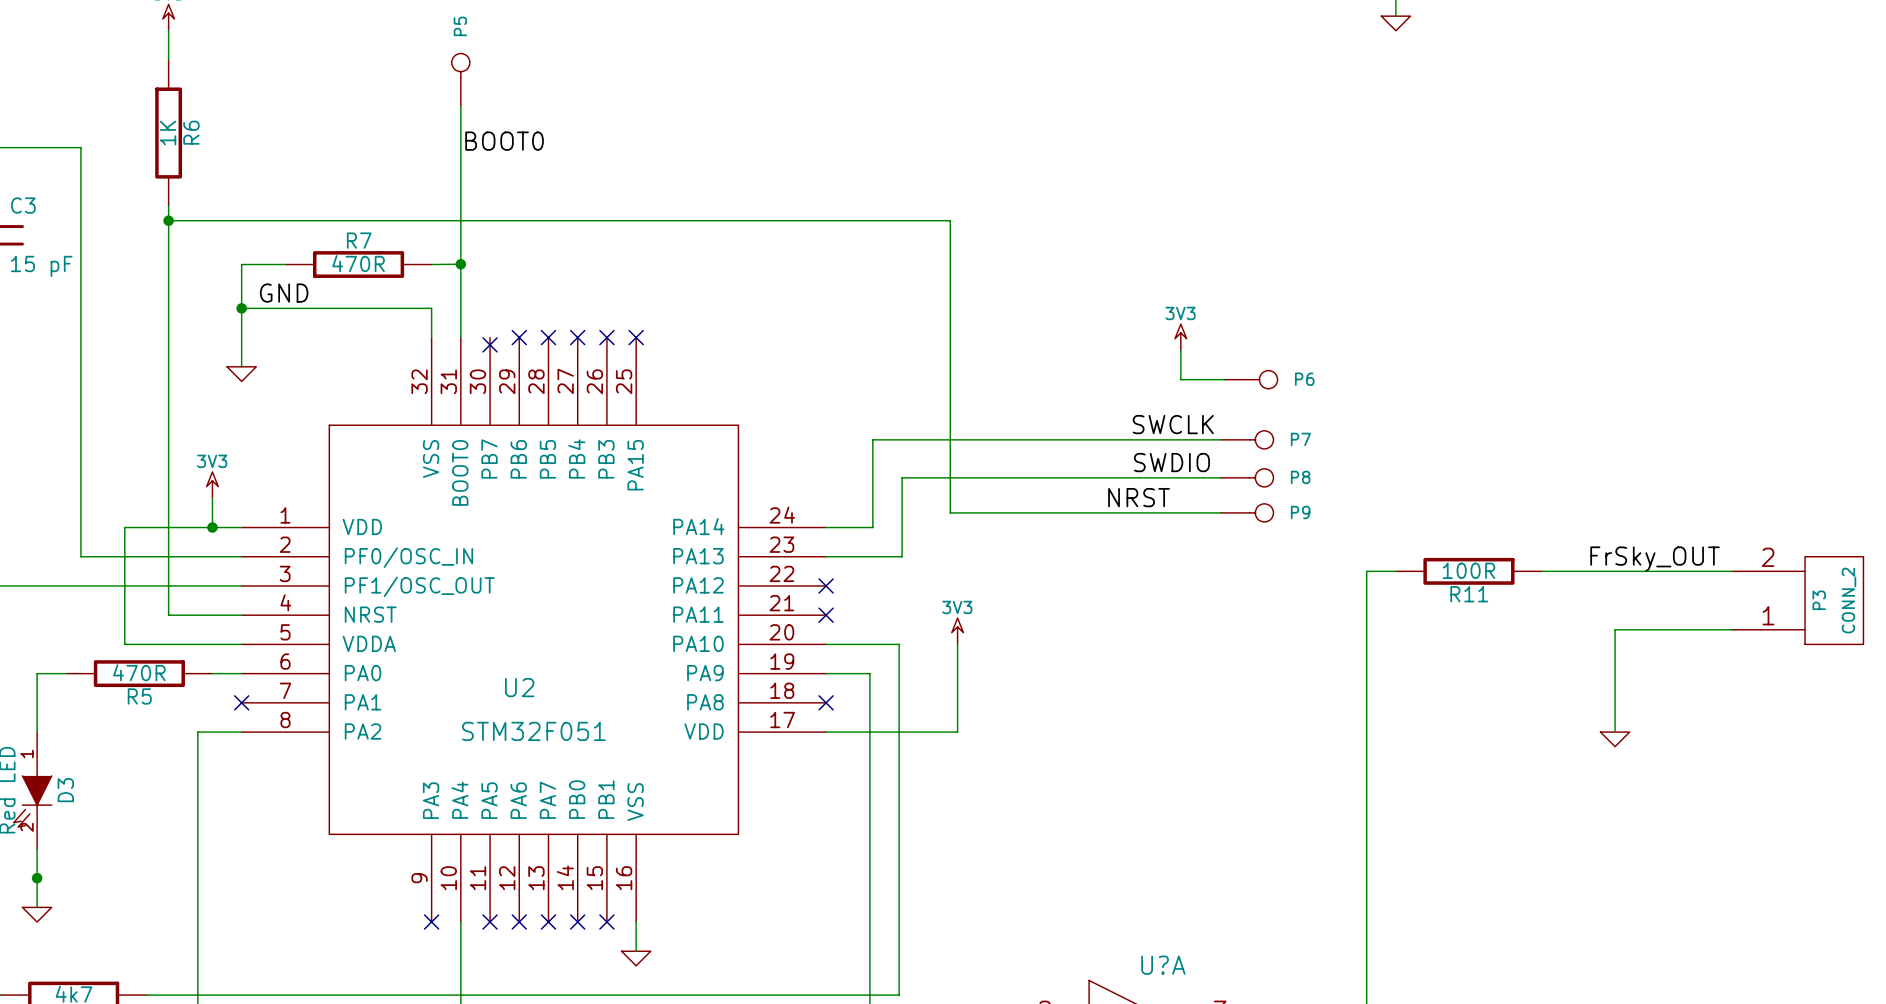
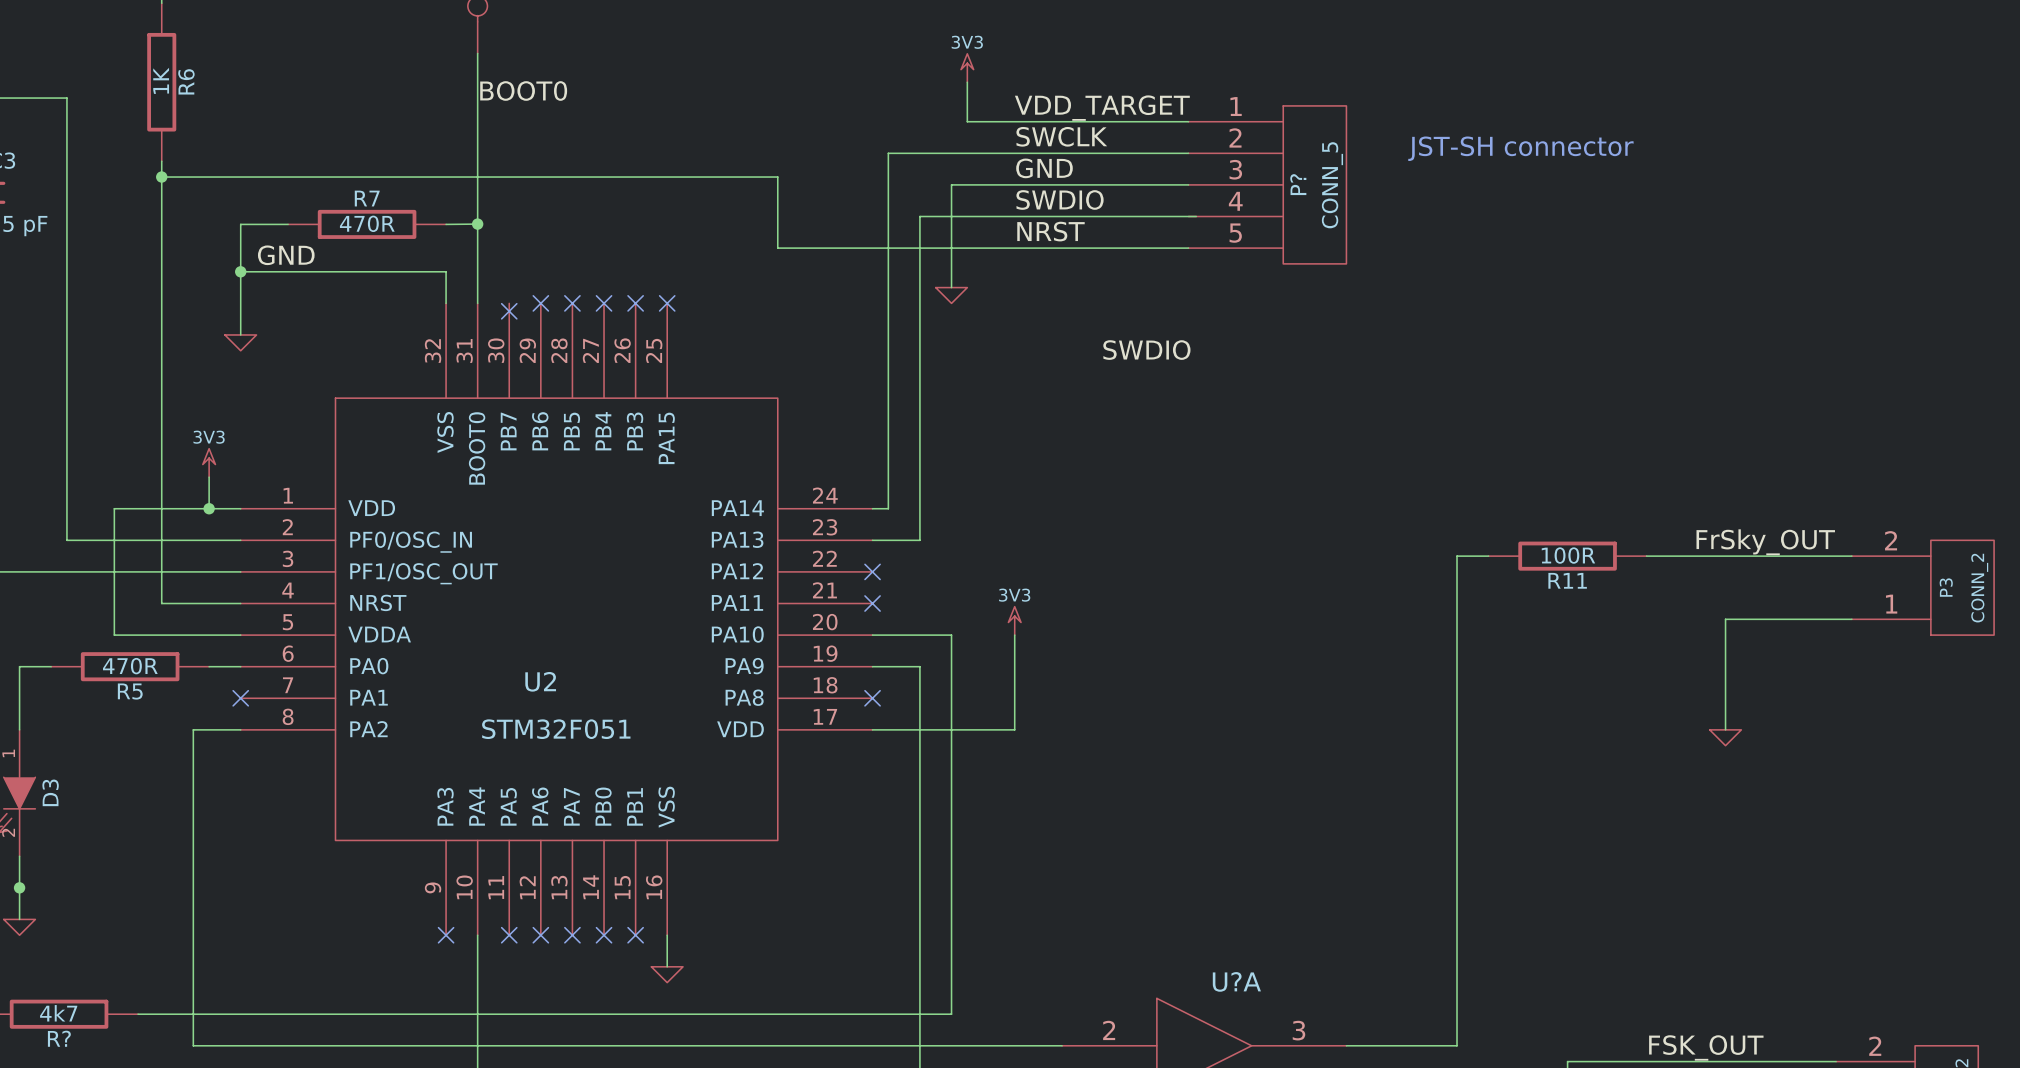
power symbol: none -> 3V3 (967, 68)
wire: none -> (967, 82) (967, 121) (1188, 121)
label: none -> VDD_TARGET (1102, 108)
label: none -> SWCLK (1061, 136)
text: none -> JST-SH connector (1520, 148)
label: none -> GND (1044, 168)
wire: (738, 220) (950, 220) (950, 512) (1220, 512) -> (777, 177) (777, 248) (1188, 248)
wire: none -> (1188, 184) (951, 184) (951, 287)
P?: none -> CONN_5 (1267, 184)
label: none -> SWDIO (1060, 199)
power symbol: none -> (951, 295)
power symbol: 3V3 (1180, 337) -> none
wire: (1180, 350) (1180, 379) (1224, 379) -> none
P6: (1251, 379) -> none
label: SWCLK (1173, 424) -> none
wire: (1220, 439) (872, 439) (872, 527) (840, 527) -> (1188, 153) (888, 153) (888, 508)
P7: (1247, 439) -> none
label position: SWDIO (1171, 462) -> SWDIO (1146, 350)
wire: (1220, 477) (902, 477) (902, 556) (869, 556) -> (1196, 216) (919, 216) (919, 540)
P8: (1247, 477) -> none
label position: NRST (1139, 497) -> NRST (1050, 231)
P9: (1247, 512) -> none

